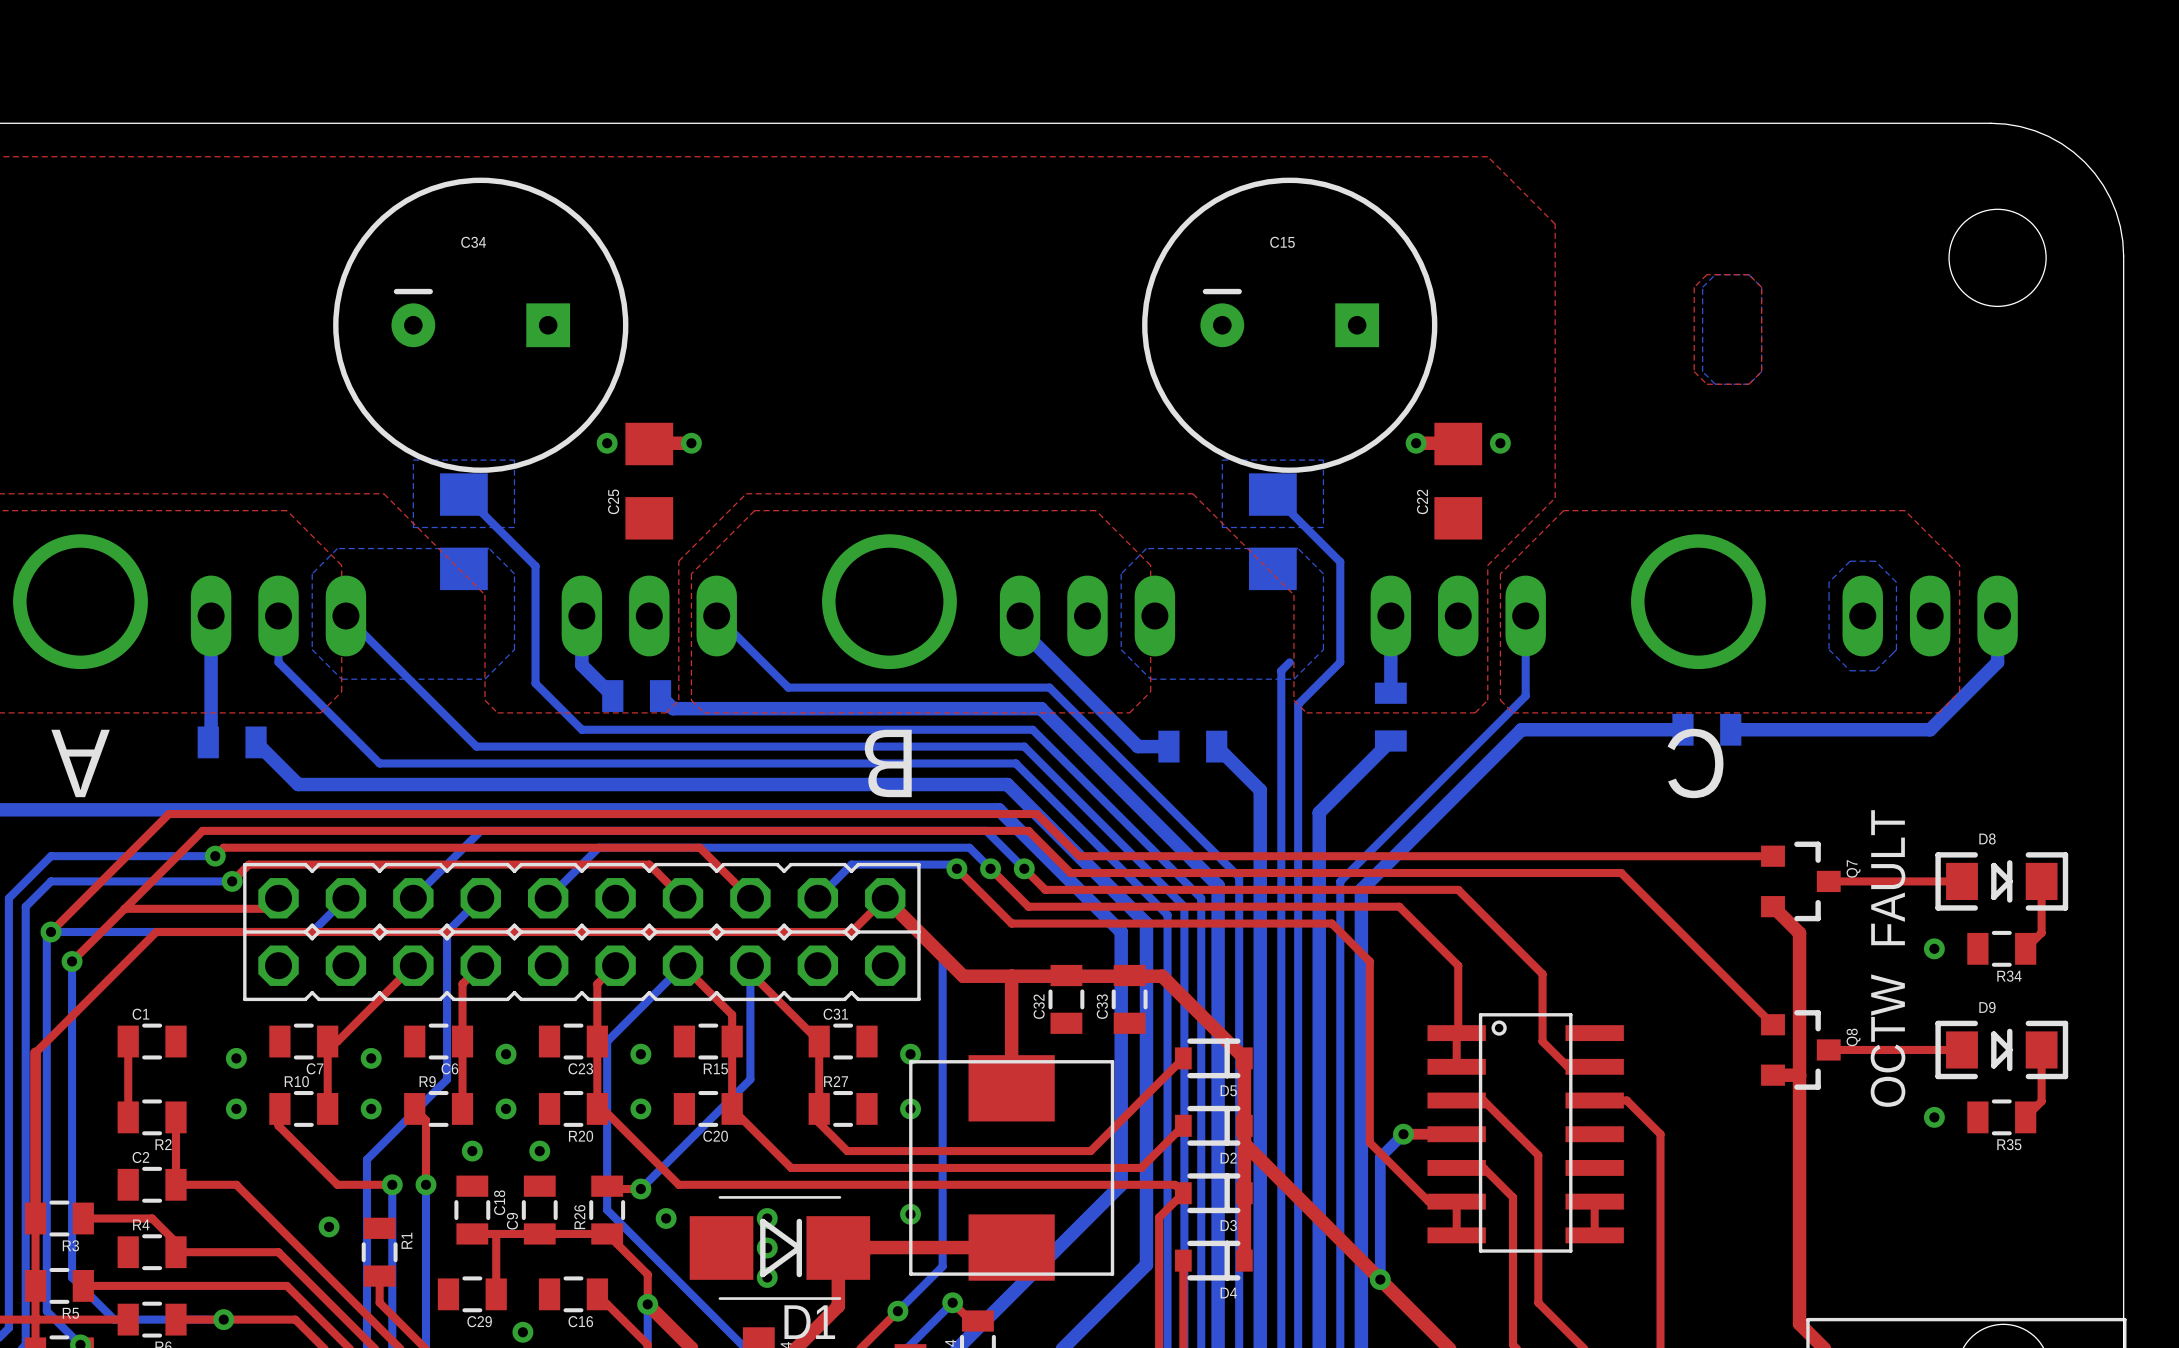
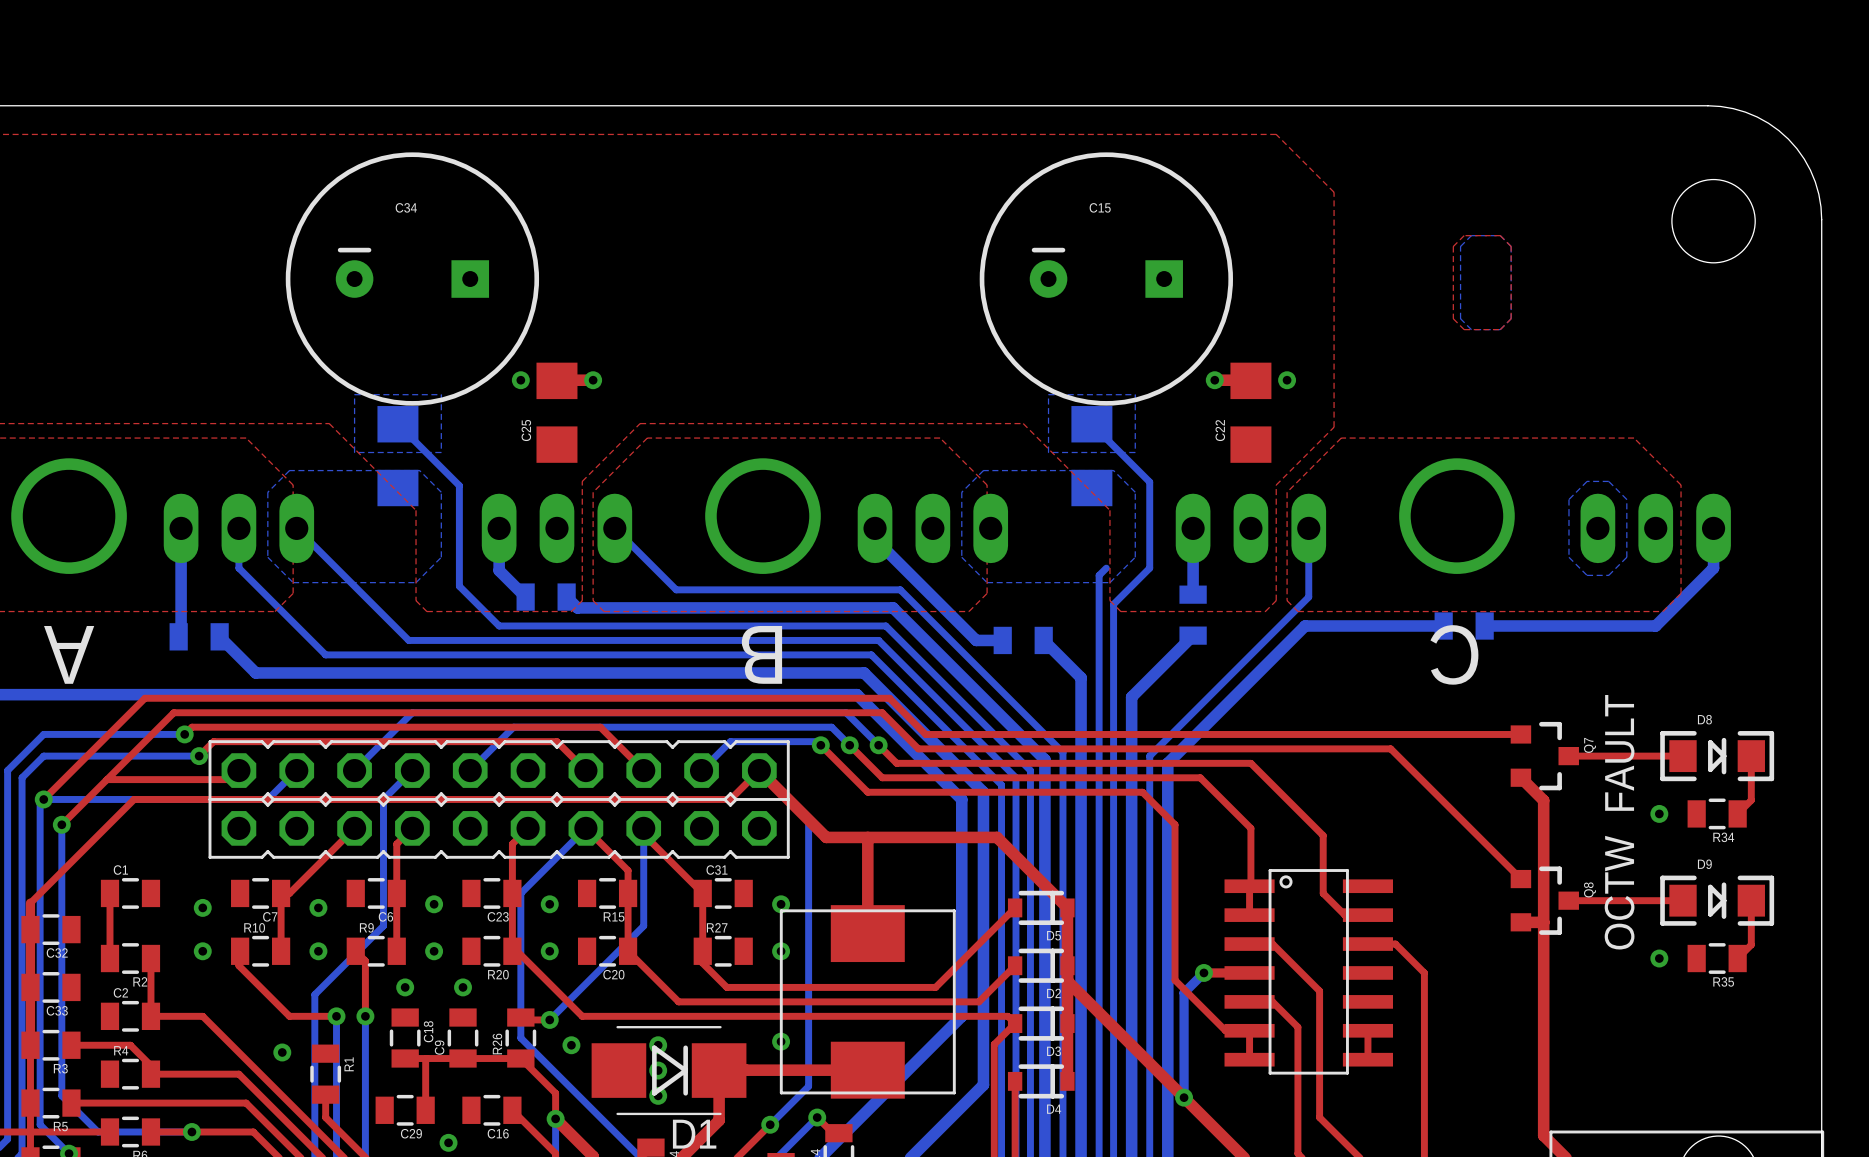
C32 rotation: 0° (1066, 999) -> 90° clockwise (50, 929)
C32 position: (1066, 999) -> (50, 929)
C33 rotation: 0° (1129, 999) -> 90° clockwise (50, 987)
C33 position: (1129, 999) -> (50, 987)

